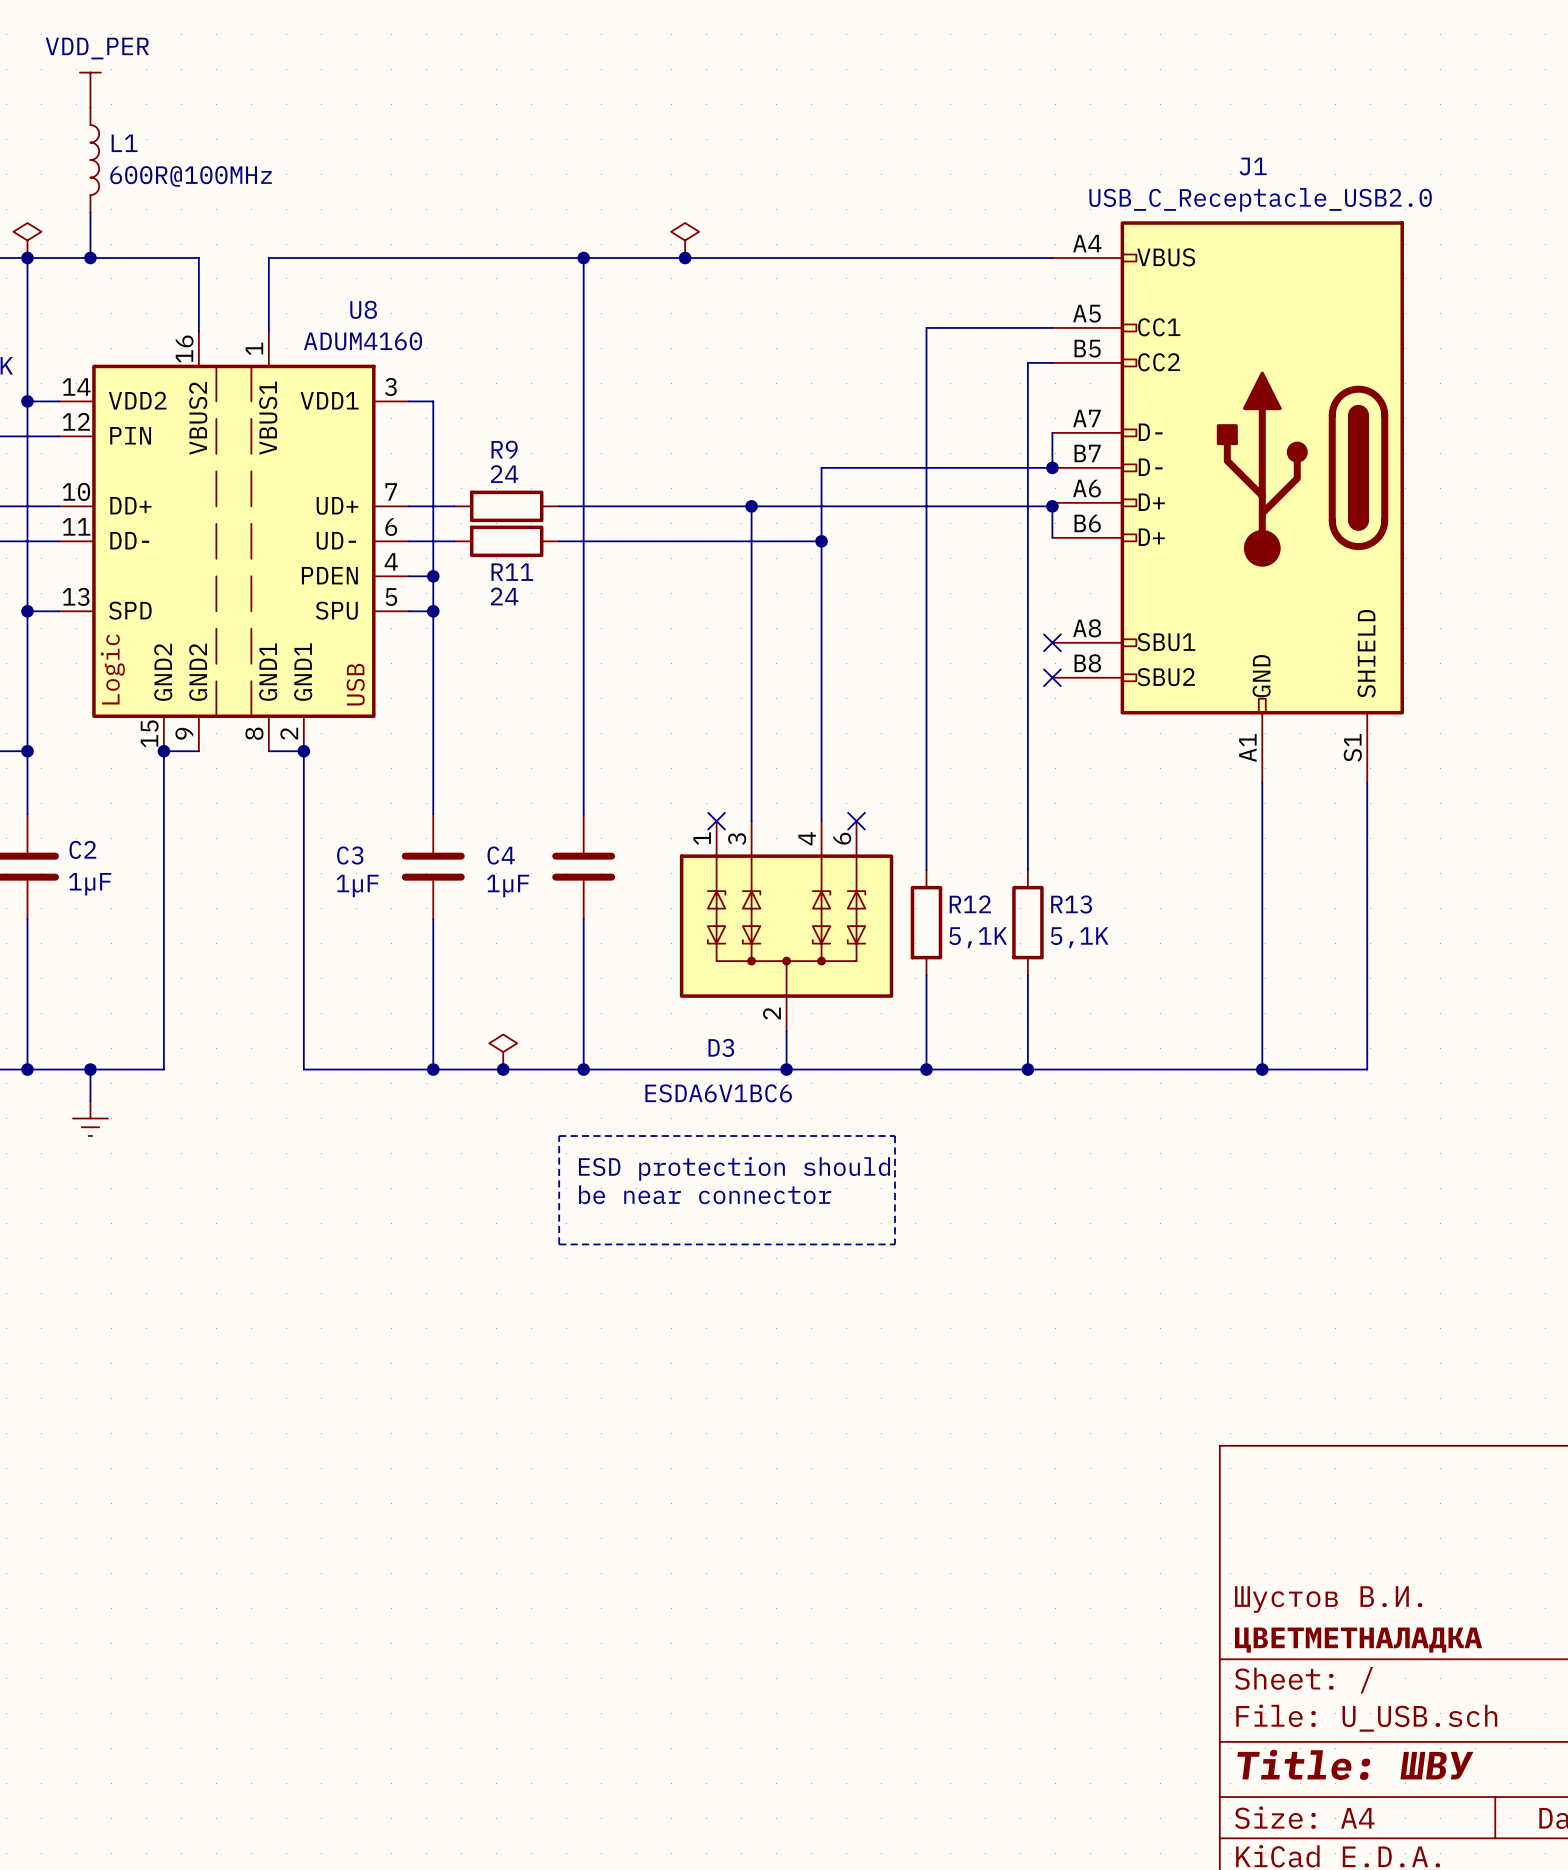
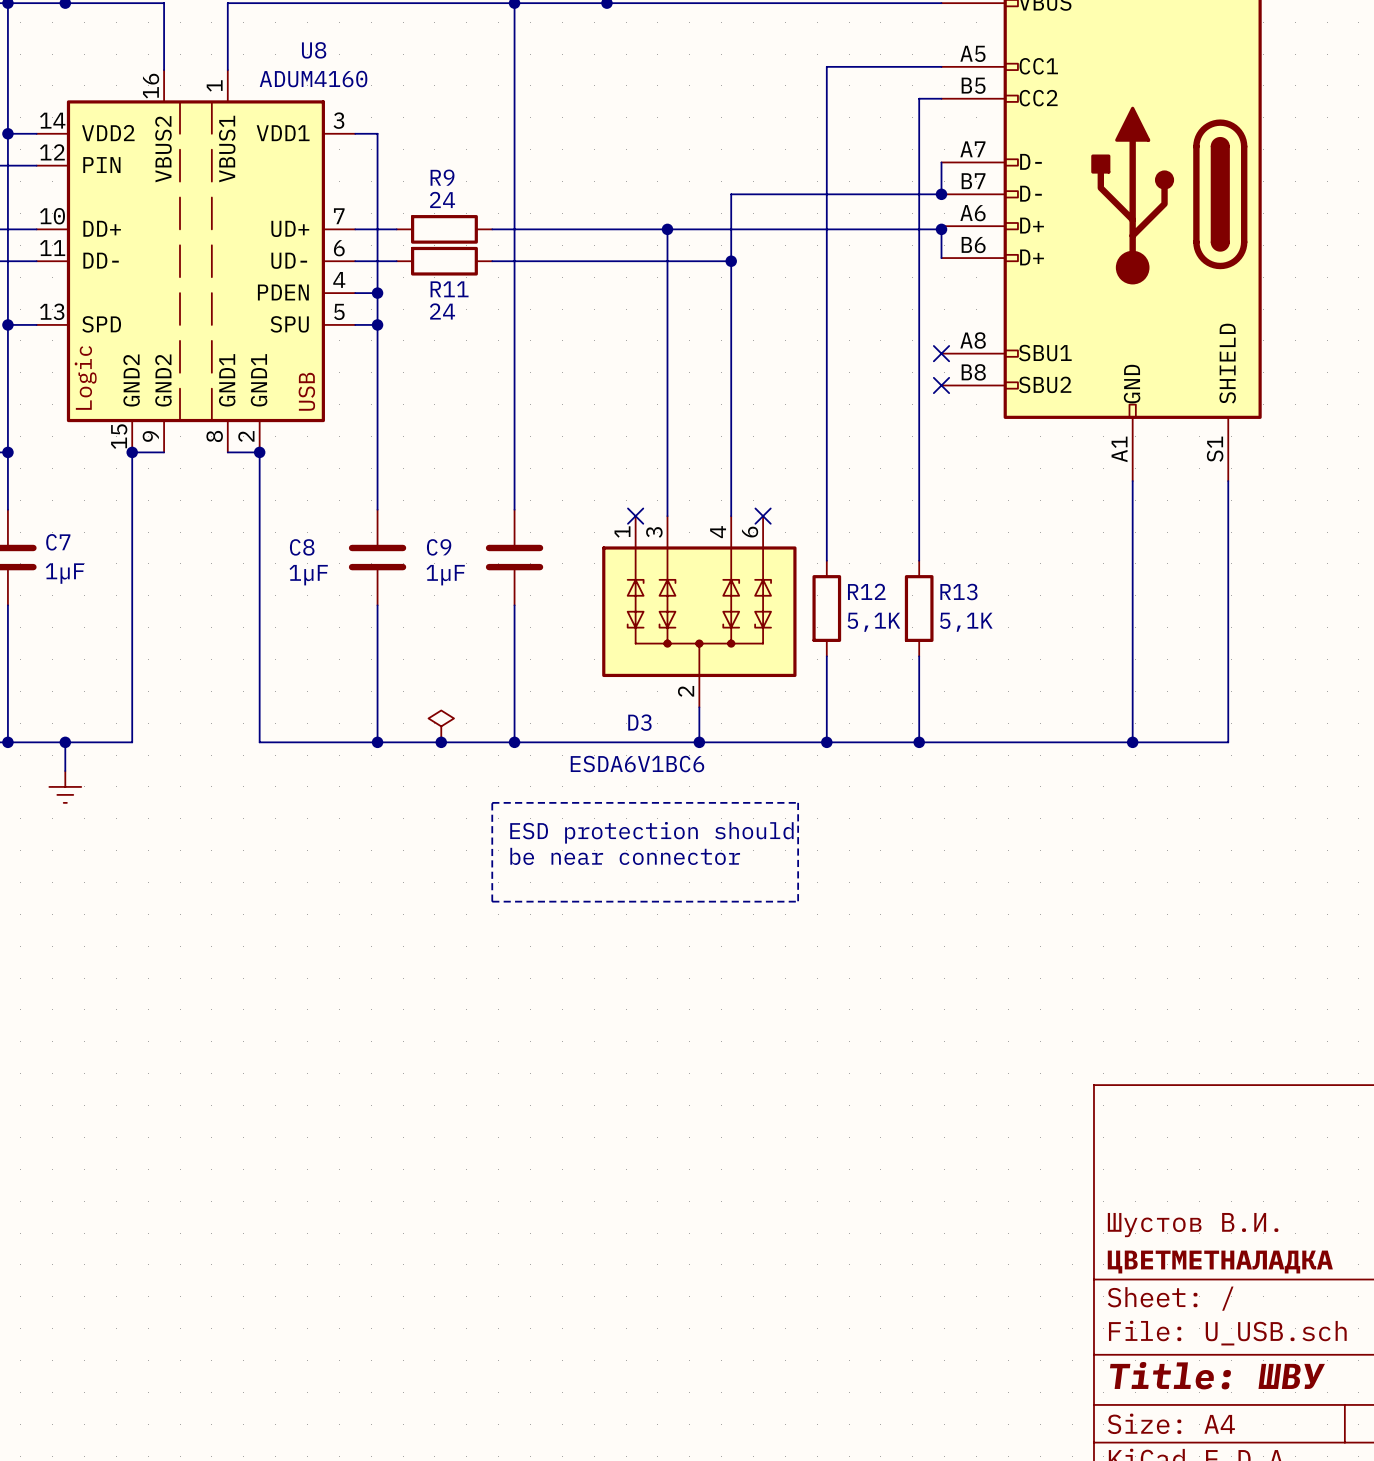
C2 name: C2 (82, 849) -> C7 (58, 542)
C3 name: C3 (350, 855) -> C8 (302, 547)
C4 name: C4 (501, 855) -> C9 (439, 547)

